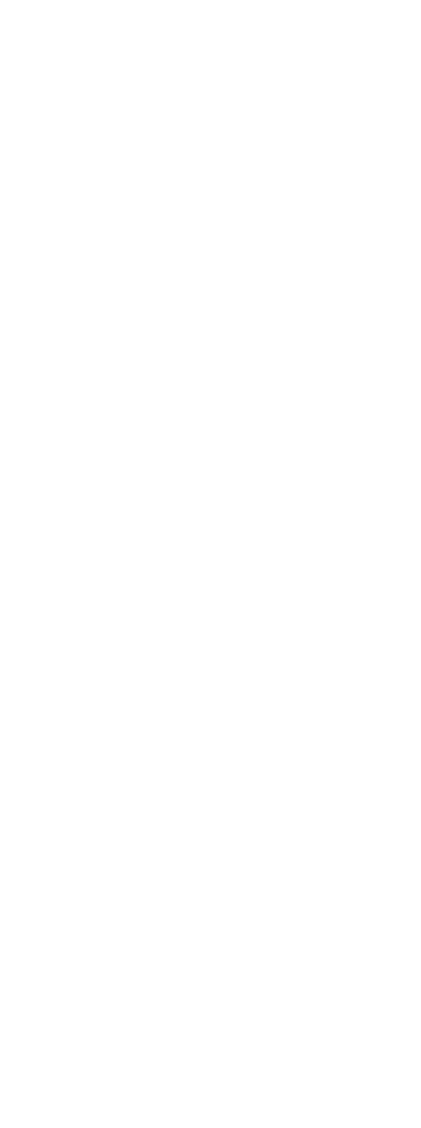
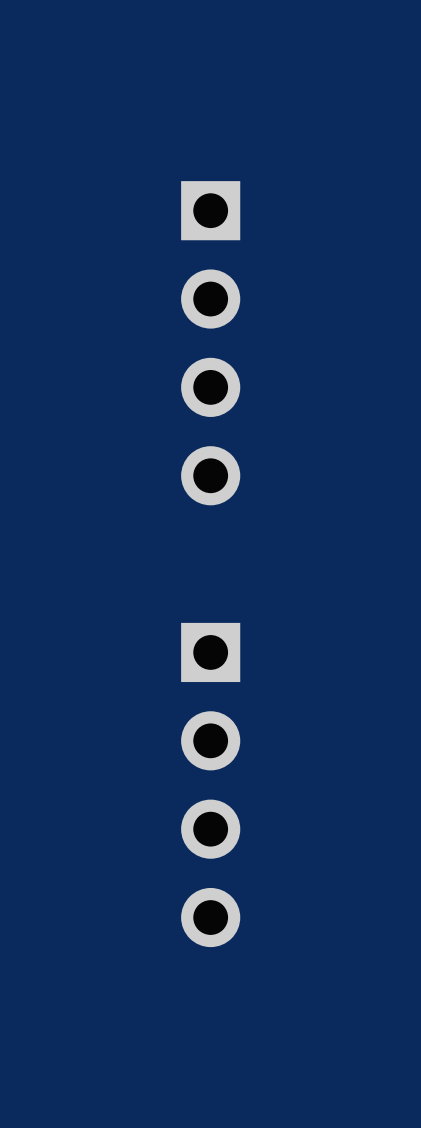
part: none -> (210, 343)
part: none -> (210, 785)

